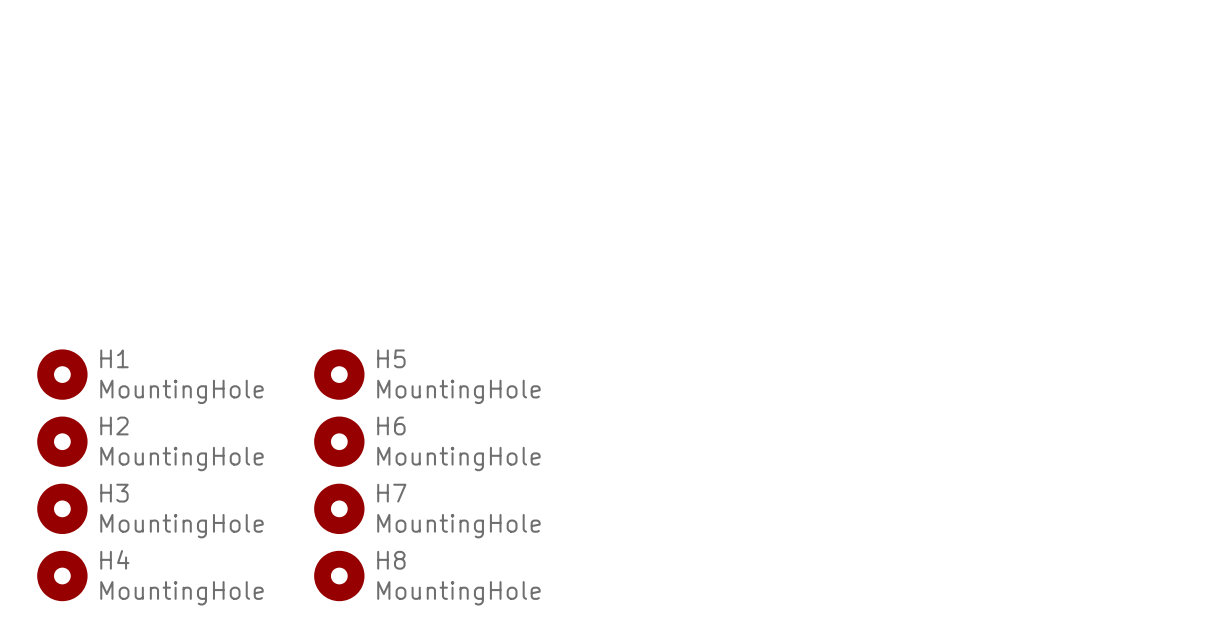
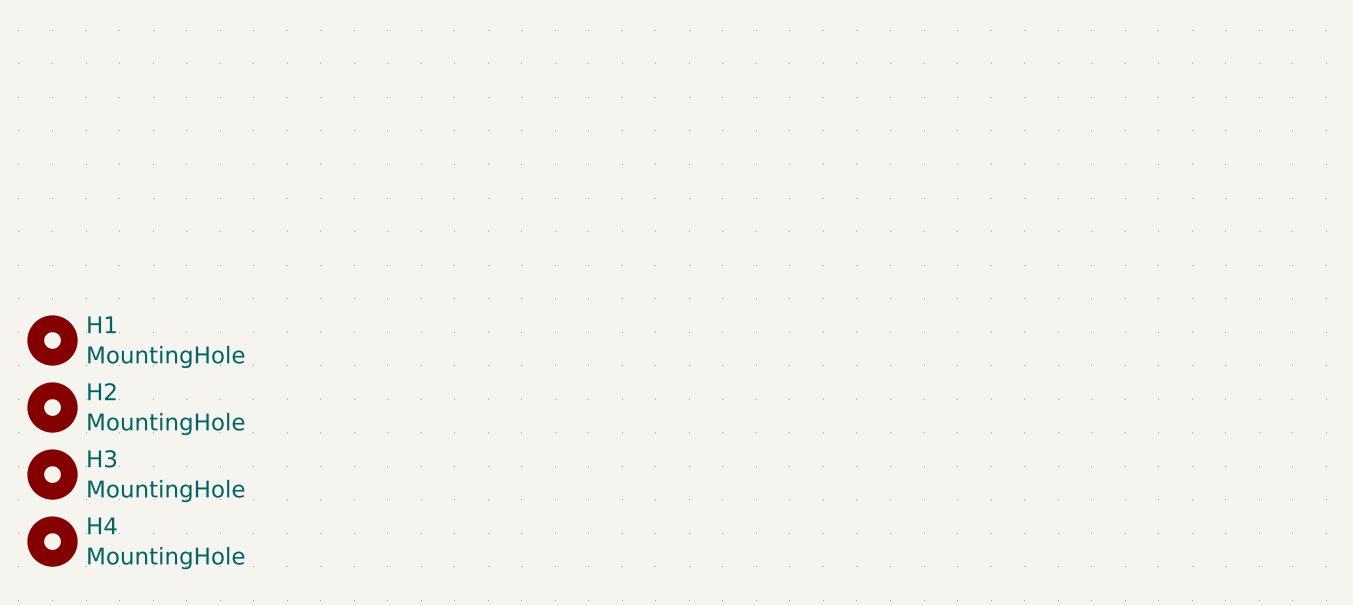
H5: MountingHole (339, 374) -> none
H6: MountingHole (339, 441) -> none
H7: MountingHole (339, 508) -> none
H8: MountingHole (339, 575) -> none

